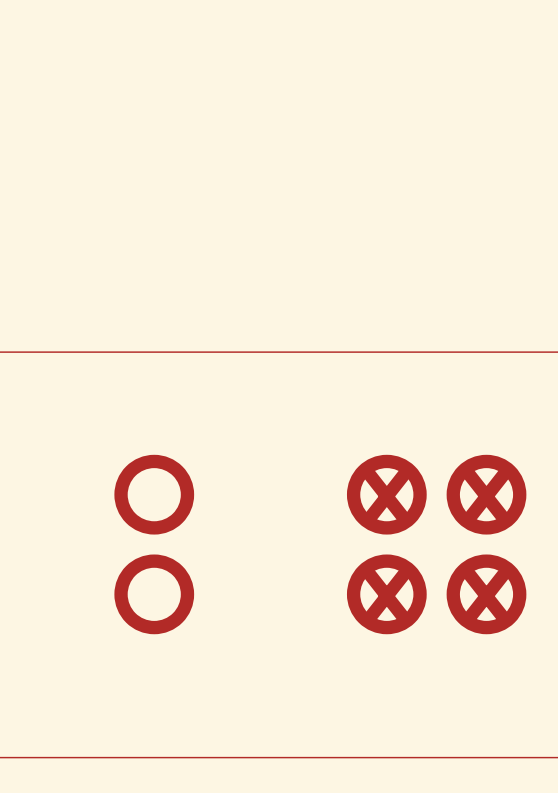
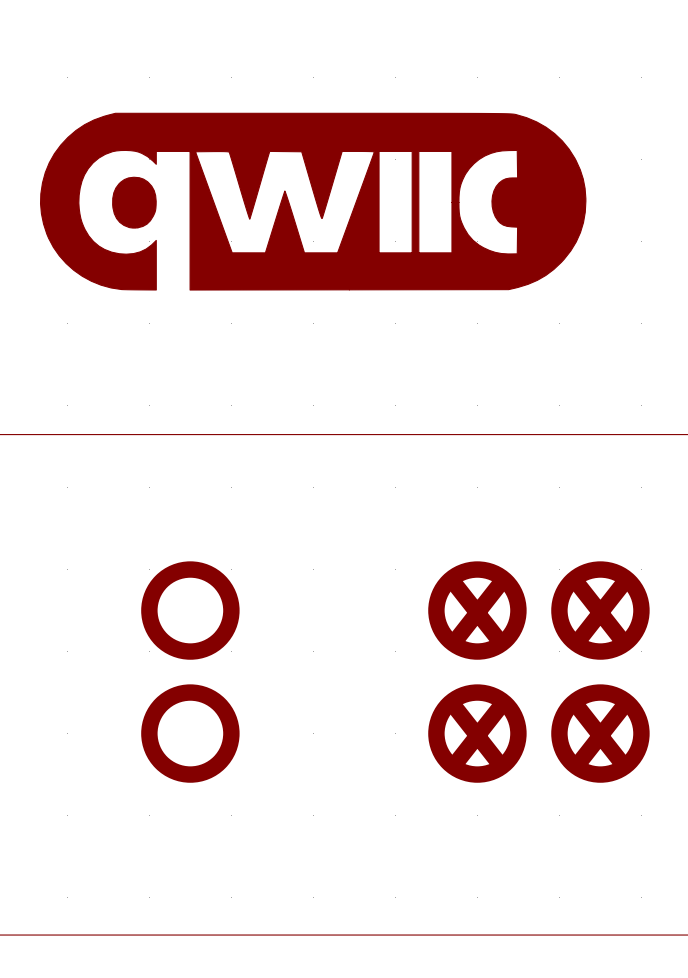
part: none -> (313, 201)

